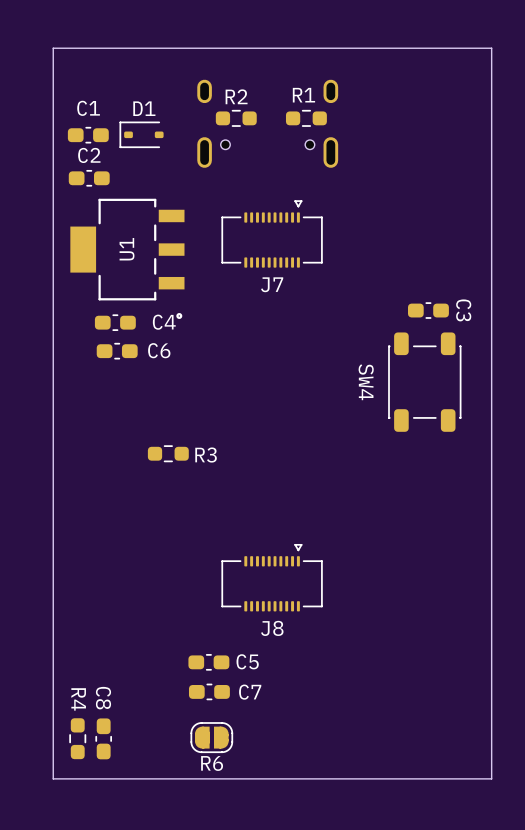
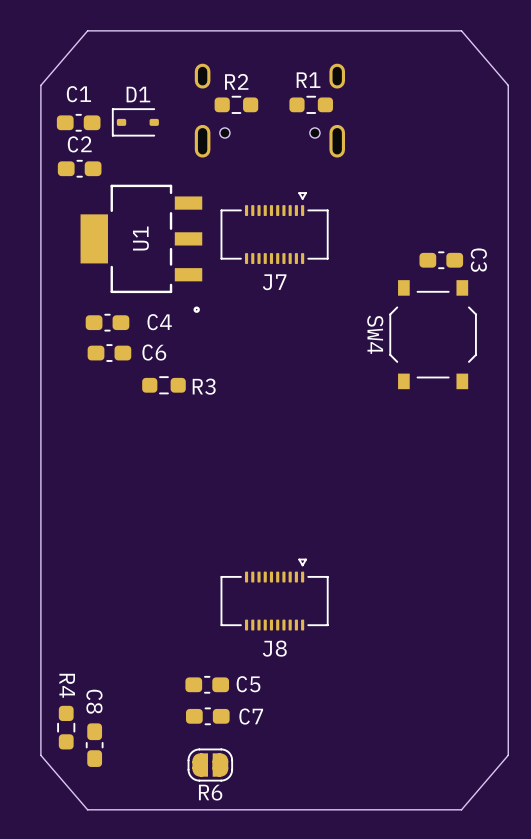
board edge: (491, 48) (53, 48) (53, 778) (491, 778) (491, 48) -> (461, 30) (508, 85) (508, 755) (461, 809) (87, 809) (40, 755) (40, 85) (87, 30) (461, 30)
U1 position: (127, 258) -> (141, 248)
C3 position: (428, 310) -> (441, 260)
SW4 footprint: [388, 332, 462, 432] -> [389, 280, 477, 390]
R3 position: (168, 453) -> (163, 385)
R4 position: (77, 738) -> (66, 727)
C8 position: (103, 738) -> (94, 745)

